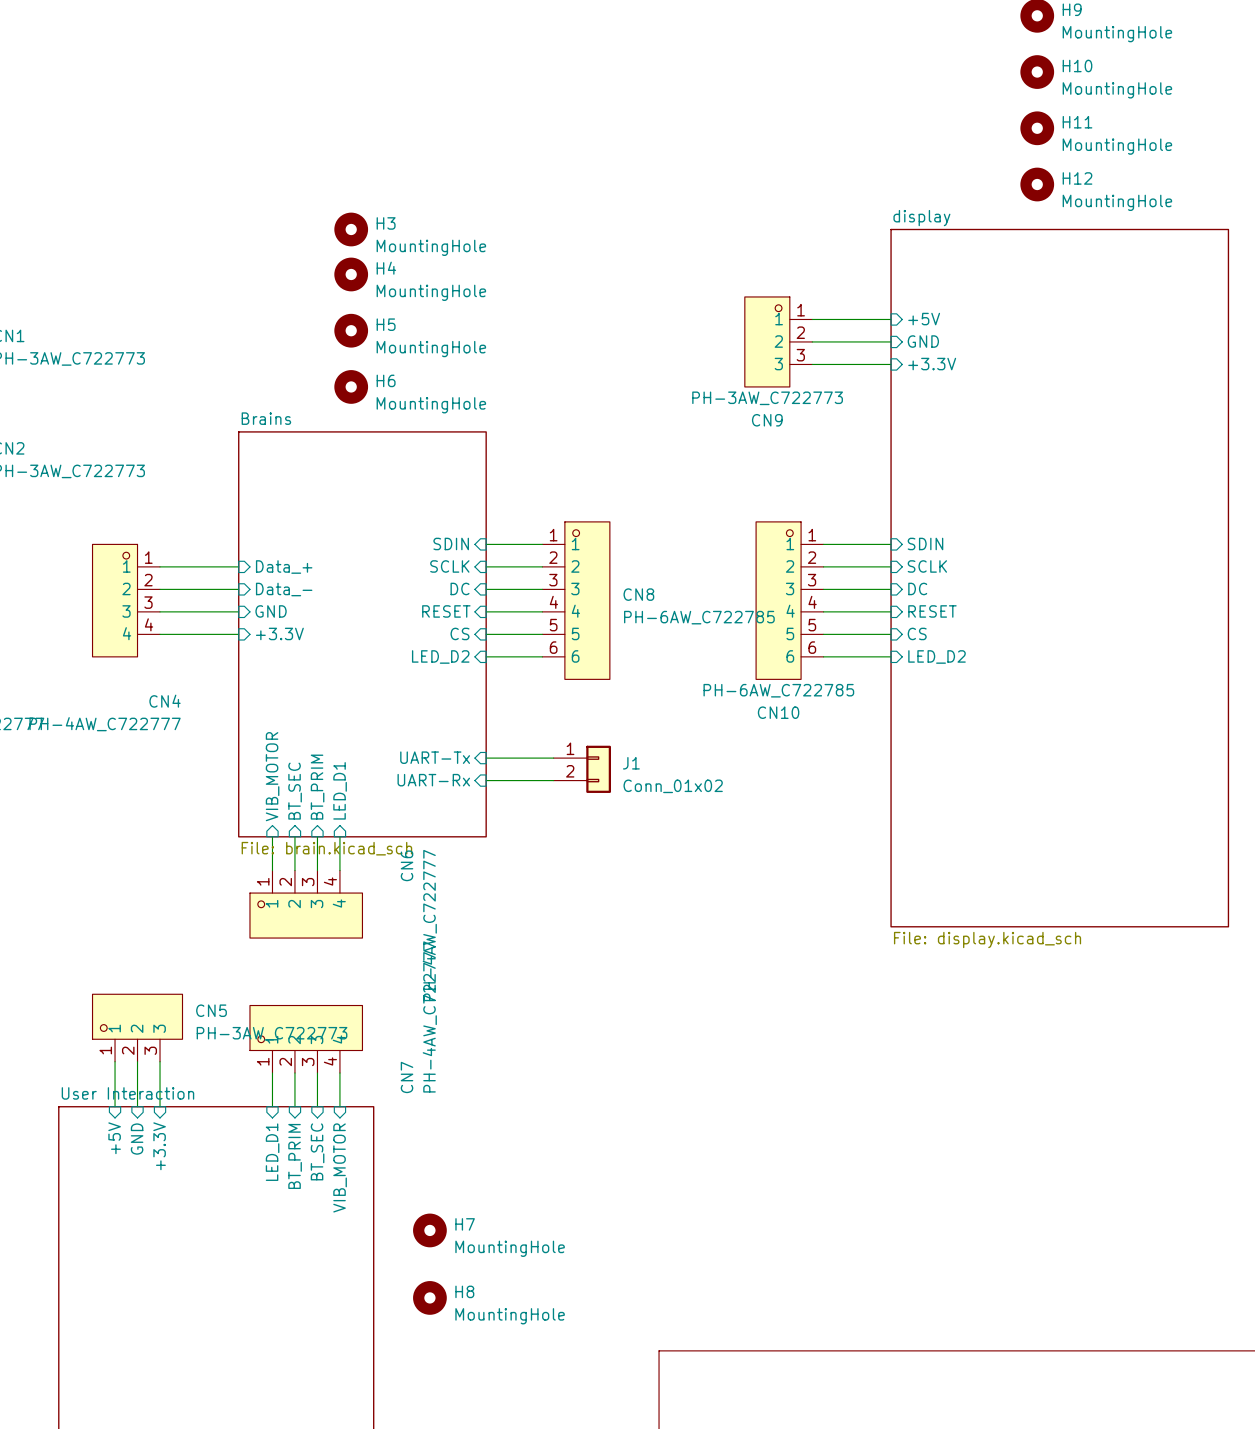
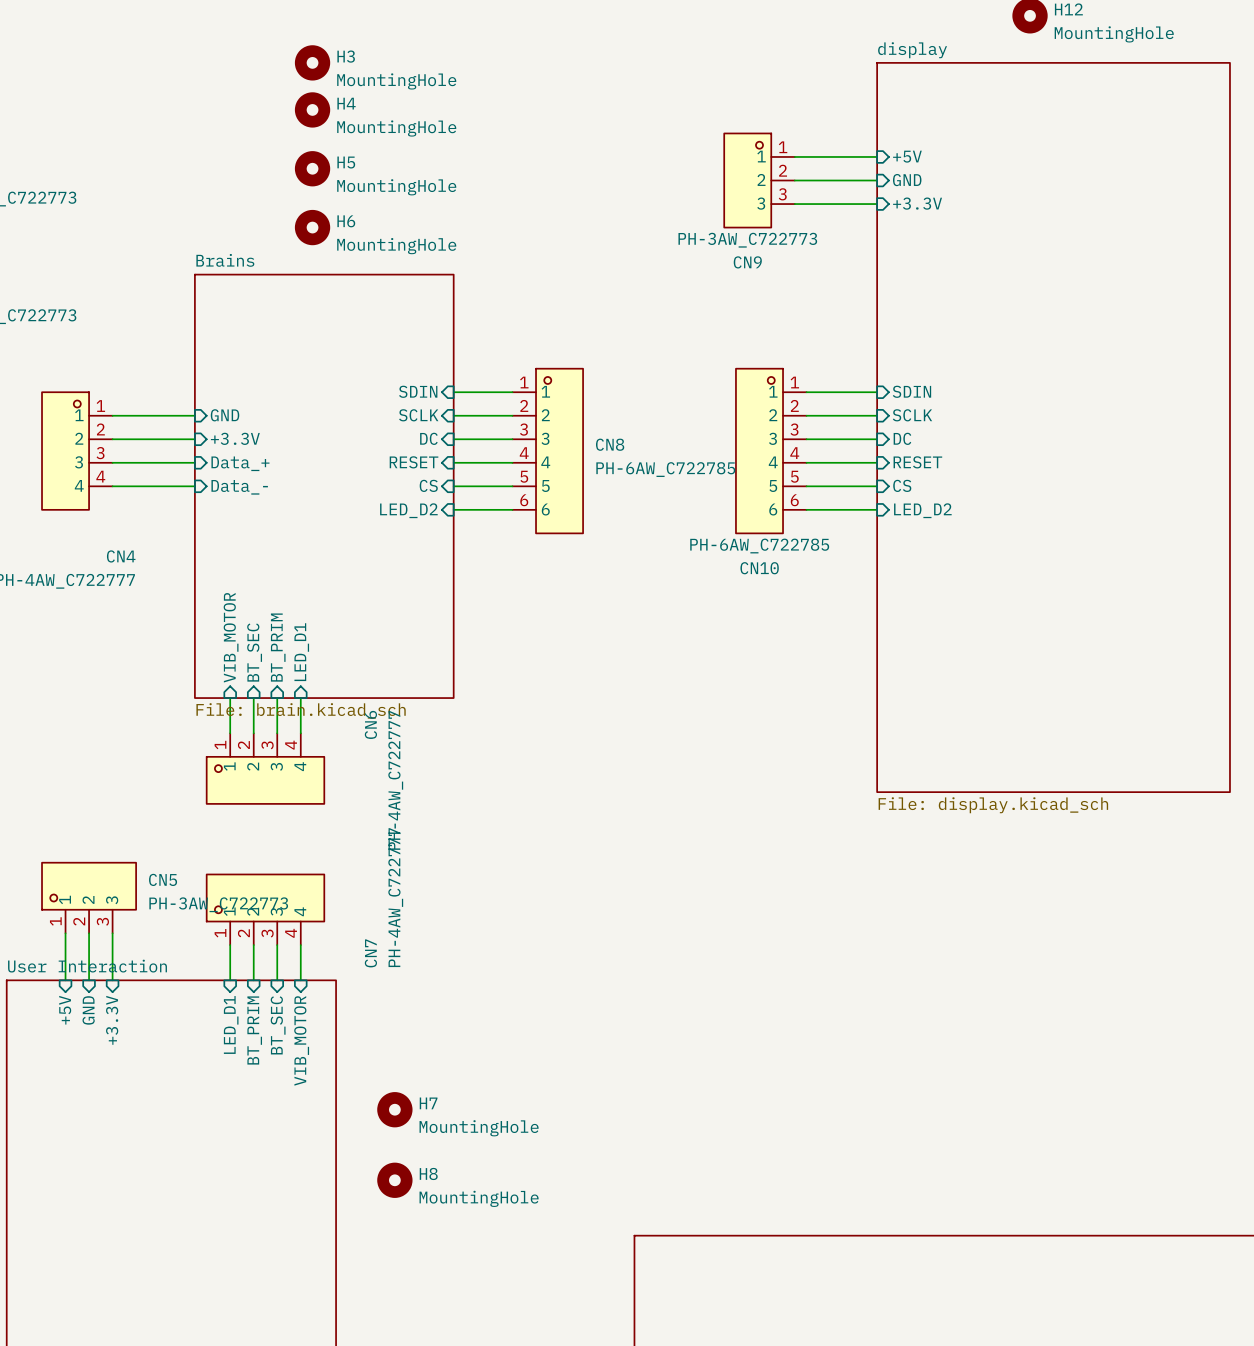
sheet pin: Data_+ (284, 567) -> GND (225, 415)
sheet pin: Data_- (284, 589) -> +3.3V (235, 438)
sheet pin: GND (271, 611) -> Data_+ (240, 463)
sheet pin: +3.3V (279, 633) -> Data_- (239, 487)
sheet pin: UART-Tx (435, 757) -> none
wire: (486, 758) (553, 758) -> none
J1: Conn_01x02 (582, 769) -> none
sheet pin: UART-Rx (433, 780) -> none
wire: (486, 780) (553, 780) -> none

